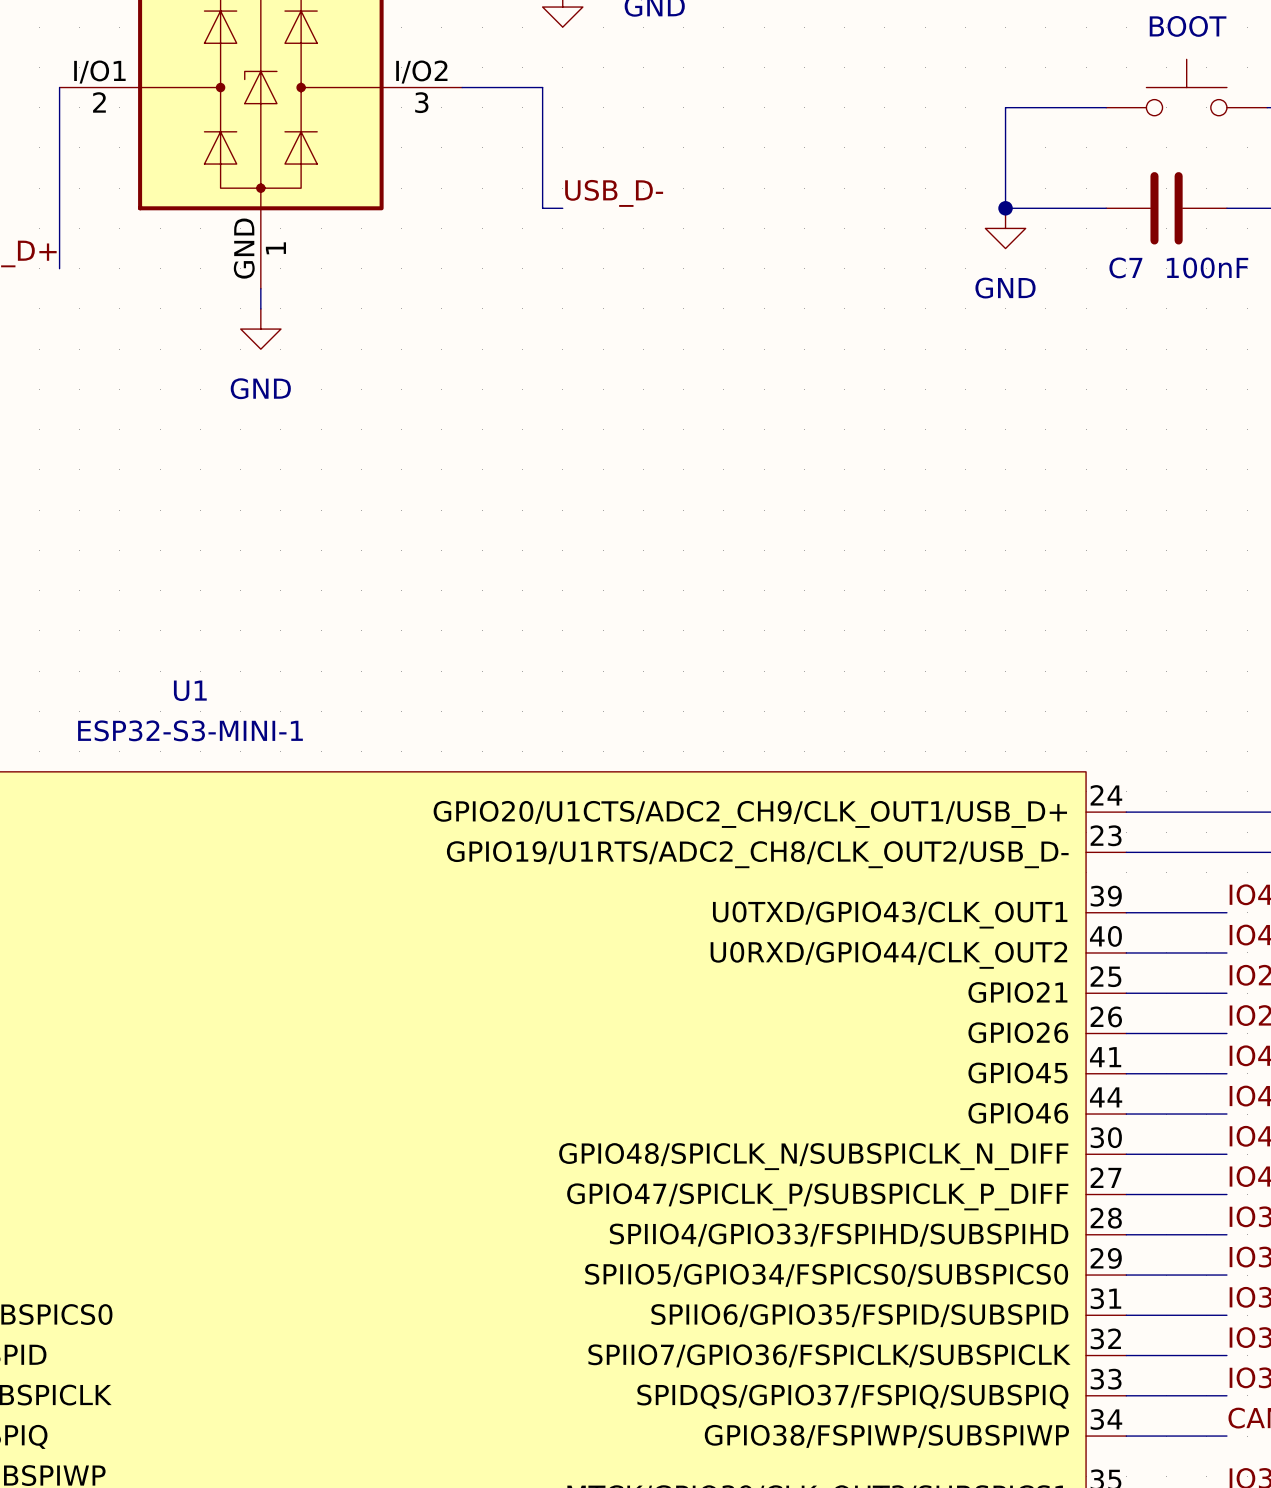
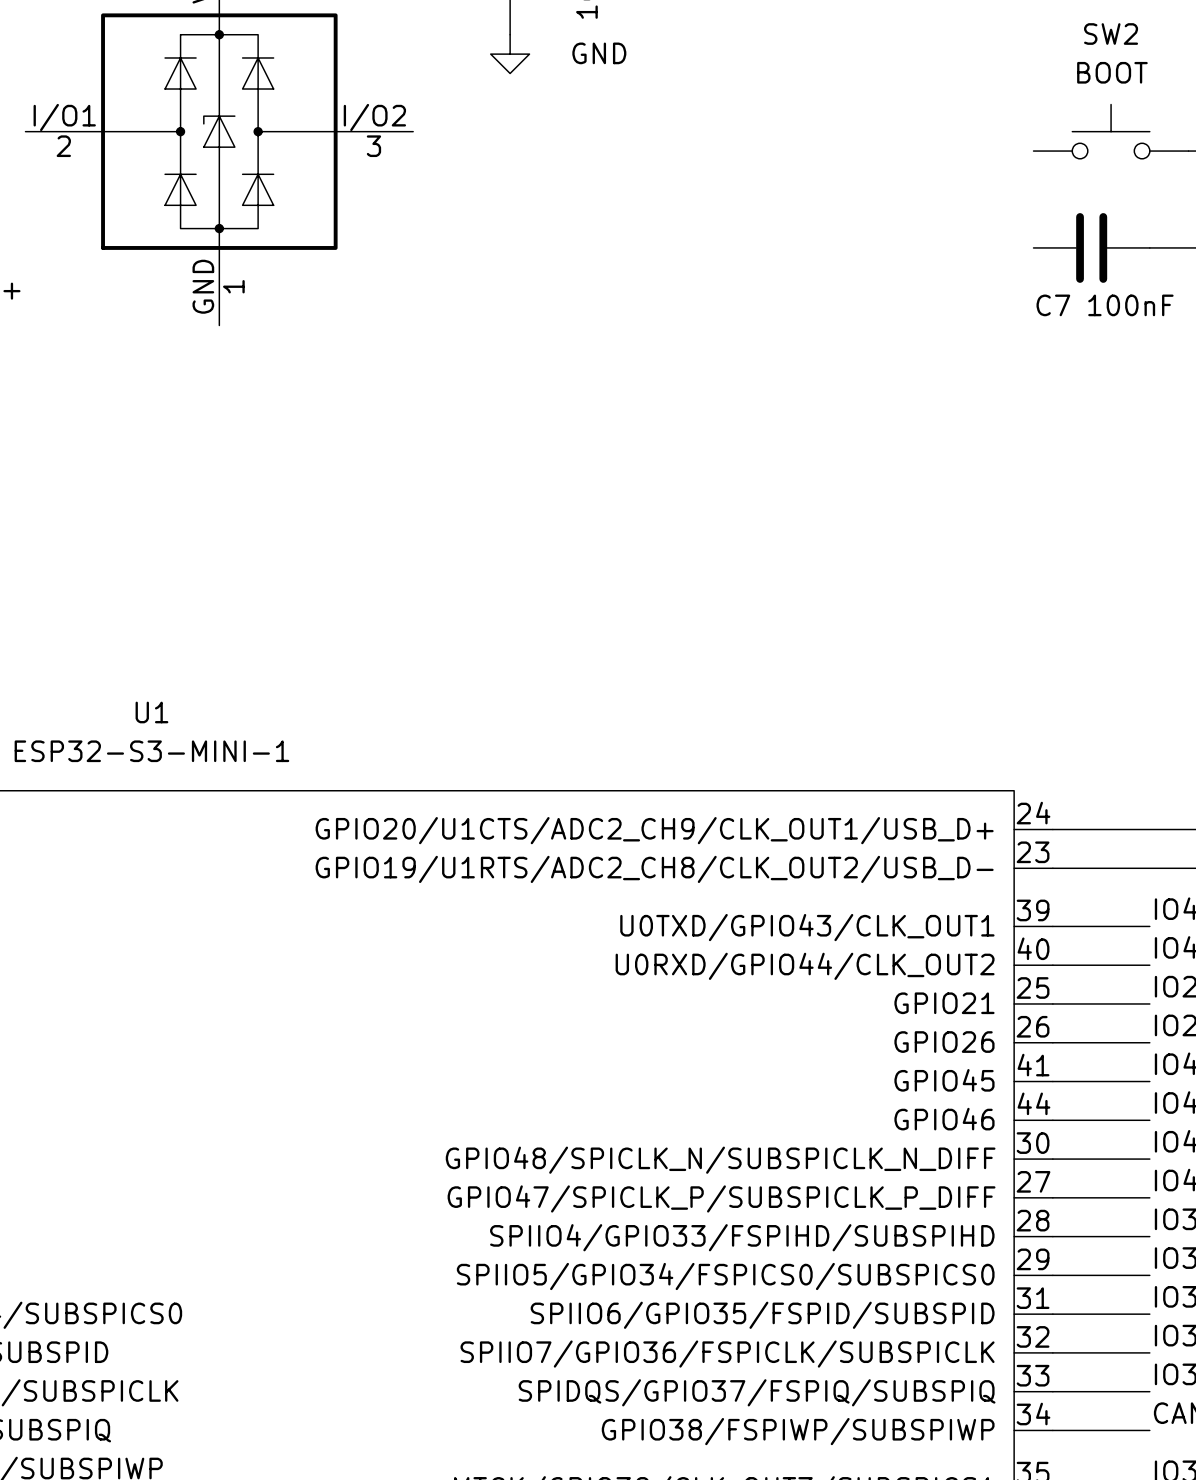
wire: (59, 87) (59, 268) -> none
wire: (462, 87) (542, 87) (542, 208) (562, 208) -> none
wire: (1106, 107) (1005, 107) (1005, 208) (1106, 208) -> none
label: USB_D- (614, 193) -> none
junction: (1005, 208) -> none
power symbol: GND (1005, 228) -> none
wire: (260, 288) (260, 308) -> none
power symbol: GND (260, 329) -> none

